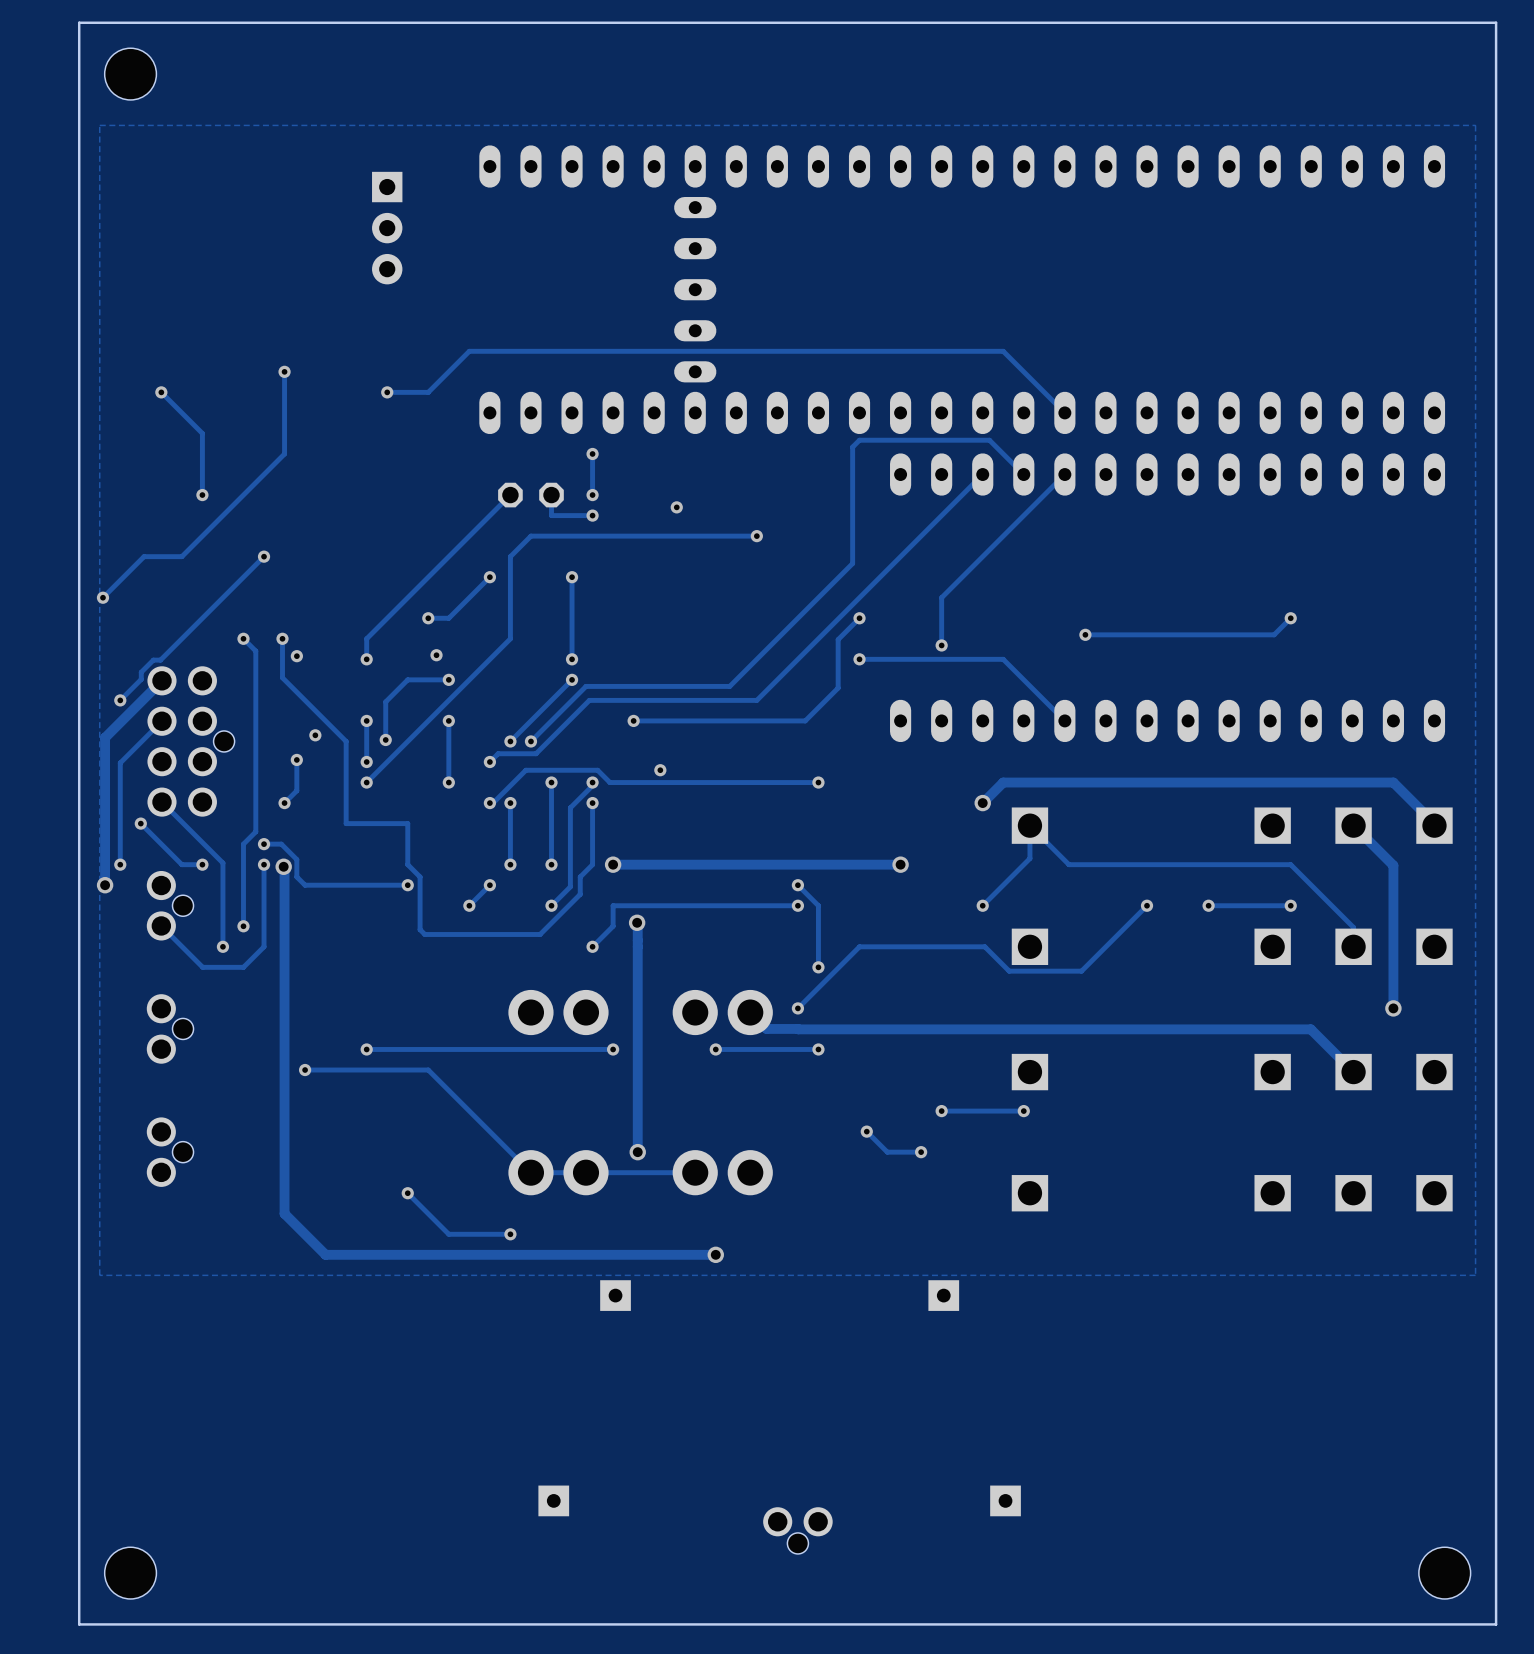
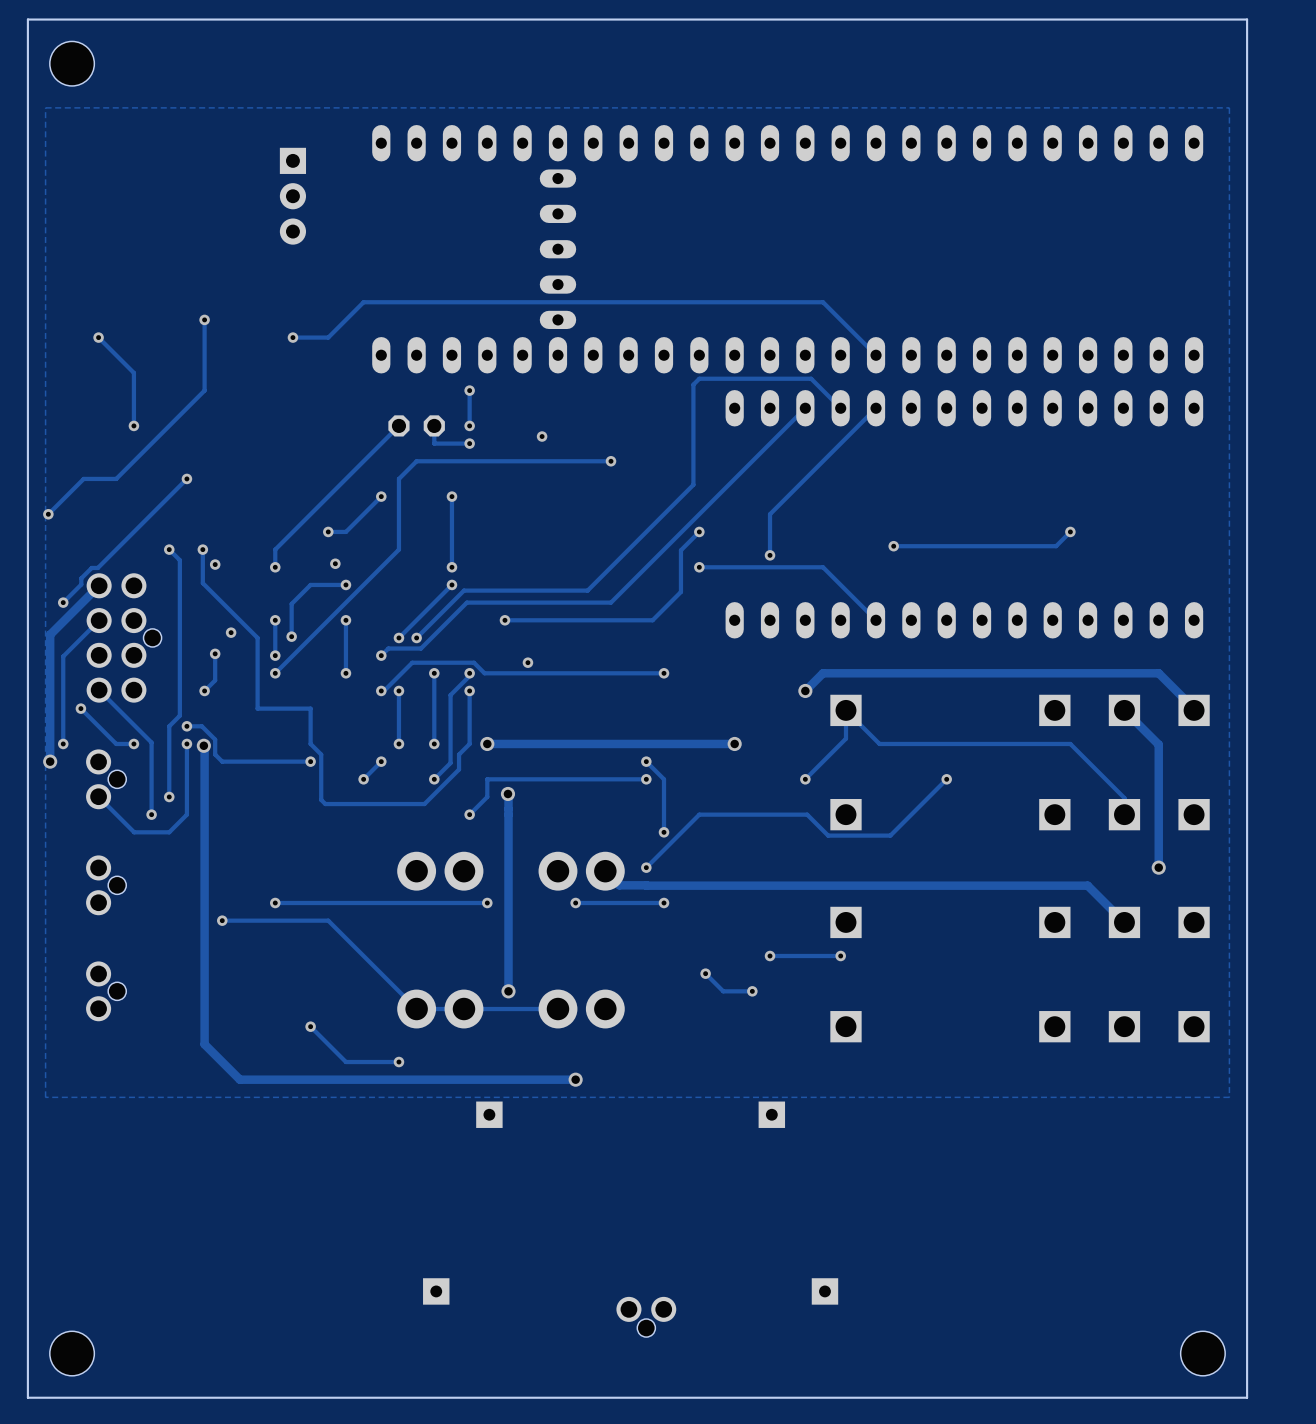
via: (1208, 905) -> none
track: (1290, 905) (1208, 905) -> none
via: (1290, 905) -> none

